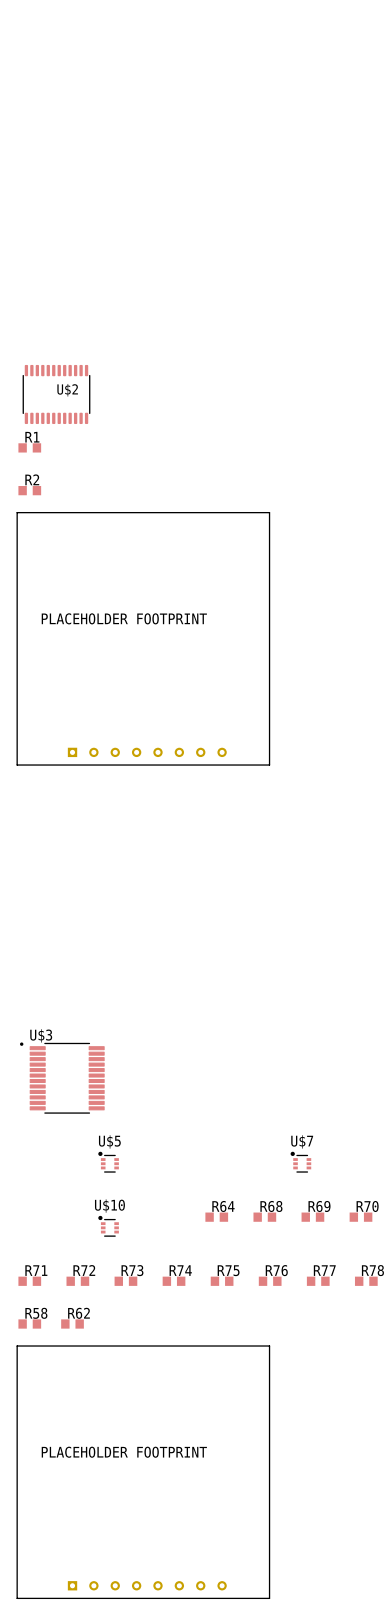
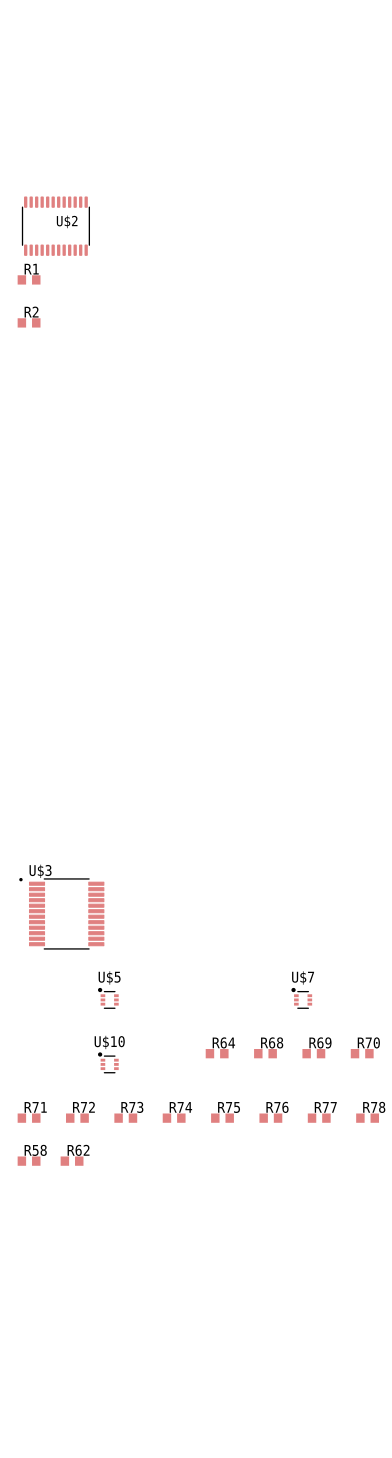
part: (143, 638) -> none
part: (143, 1472) -> none

